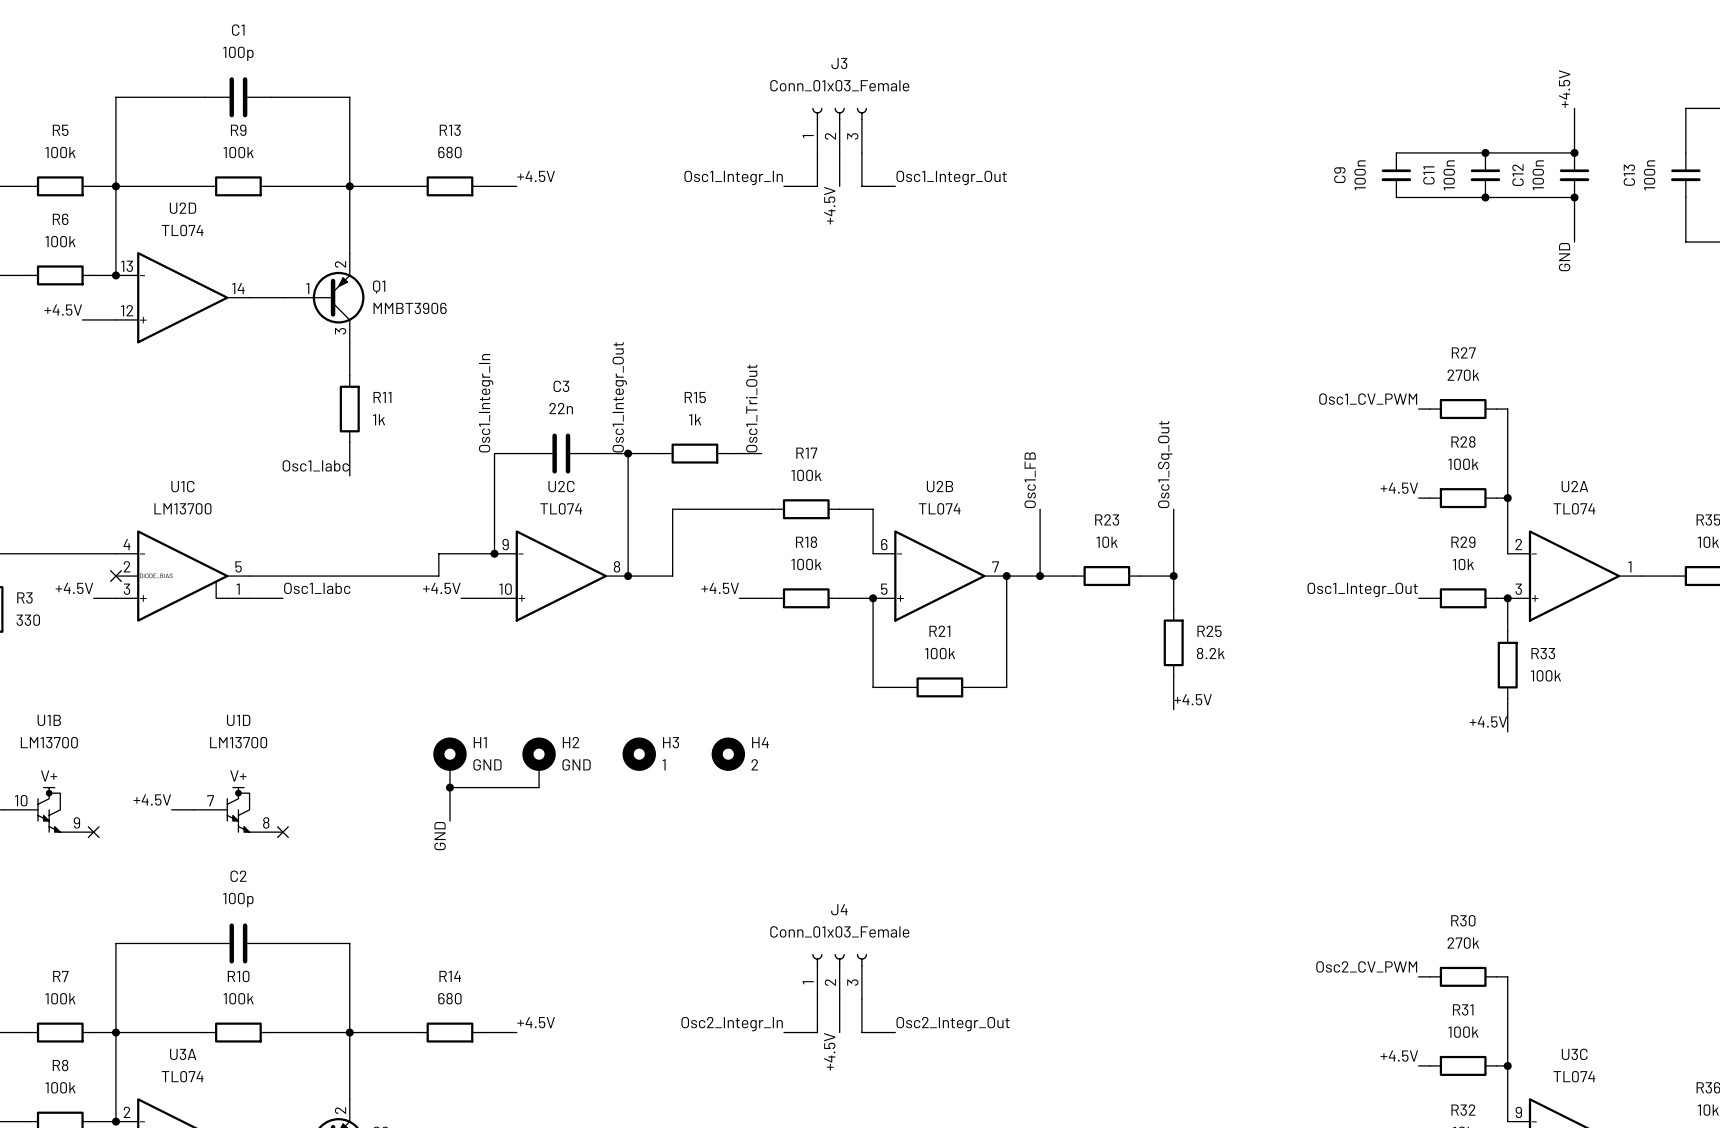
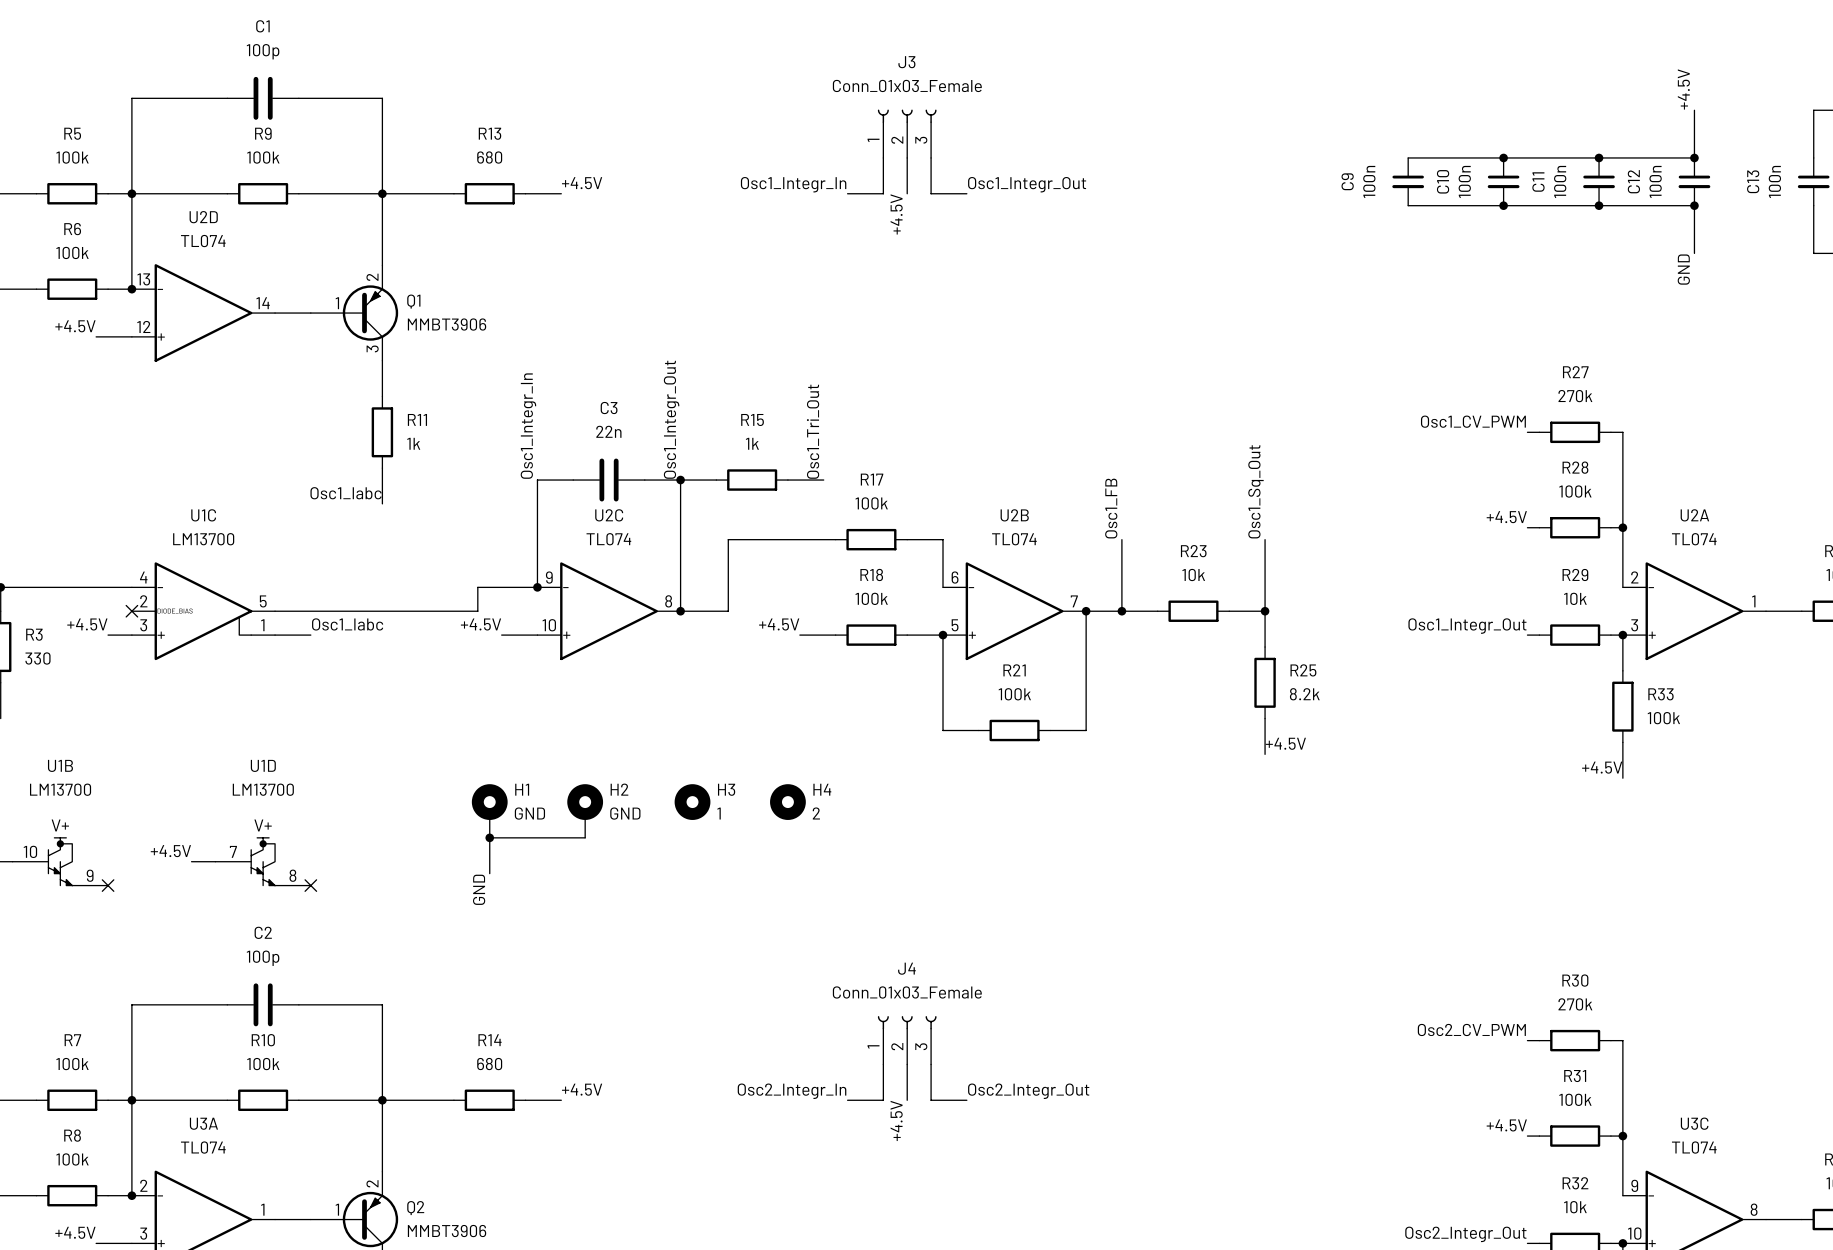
wire: none -> (1408, 157) (1503, 157)
junction: none -> (1503, 157)
C9: none -> 100n (1408, 181)
C9 name: C9 (1339, 175) -> C10 (1443, 181)
wire: none -> (1408, 205) (1503, 205)
junction: none -> (1503, 205)

